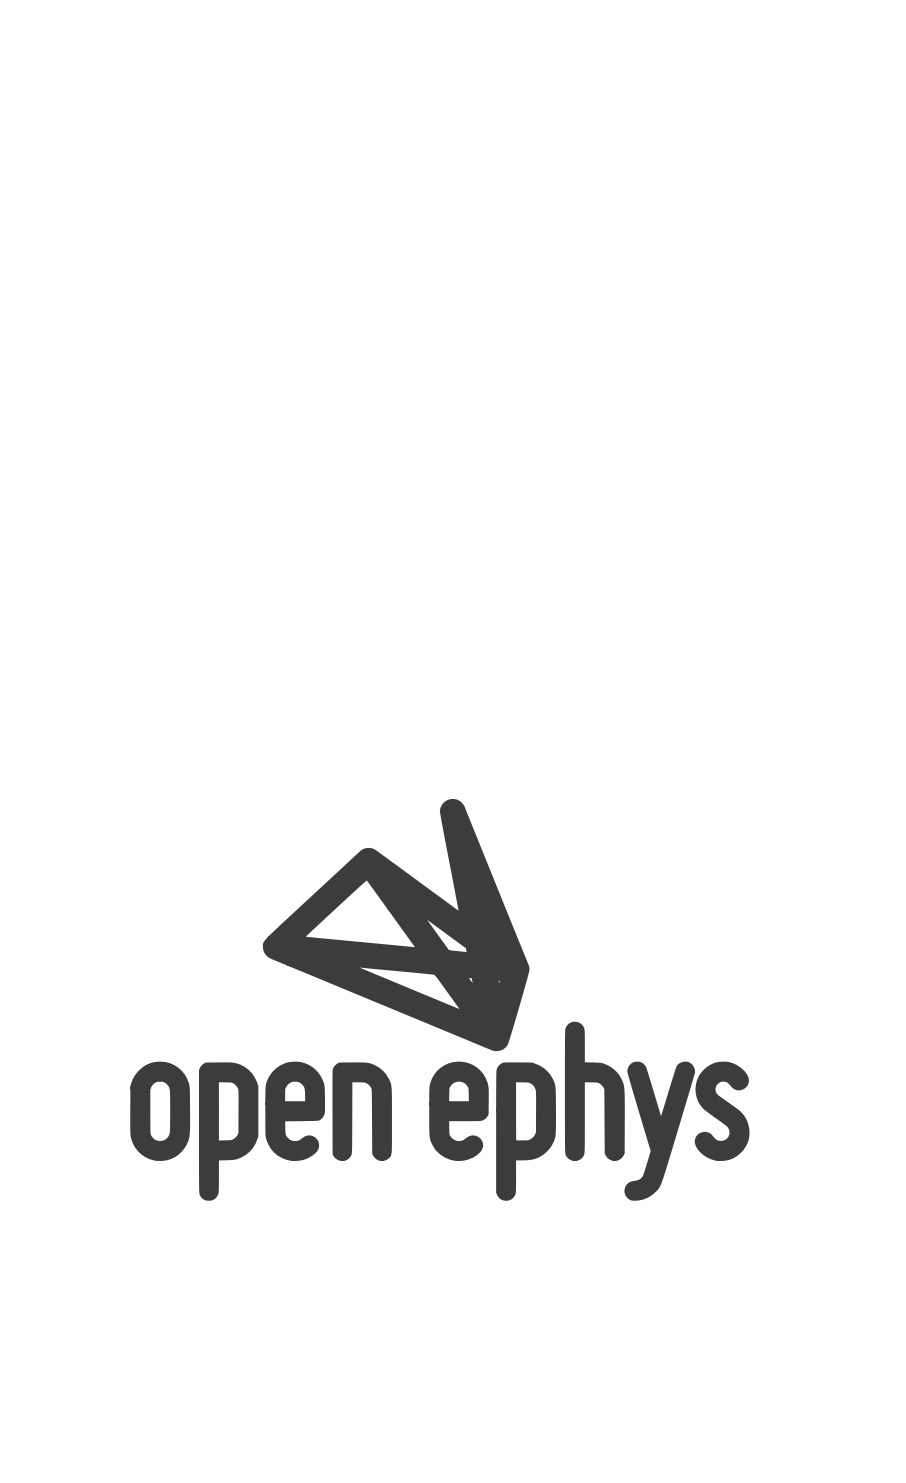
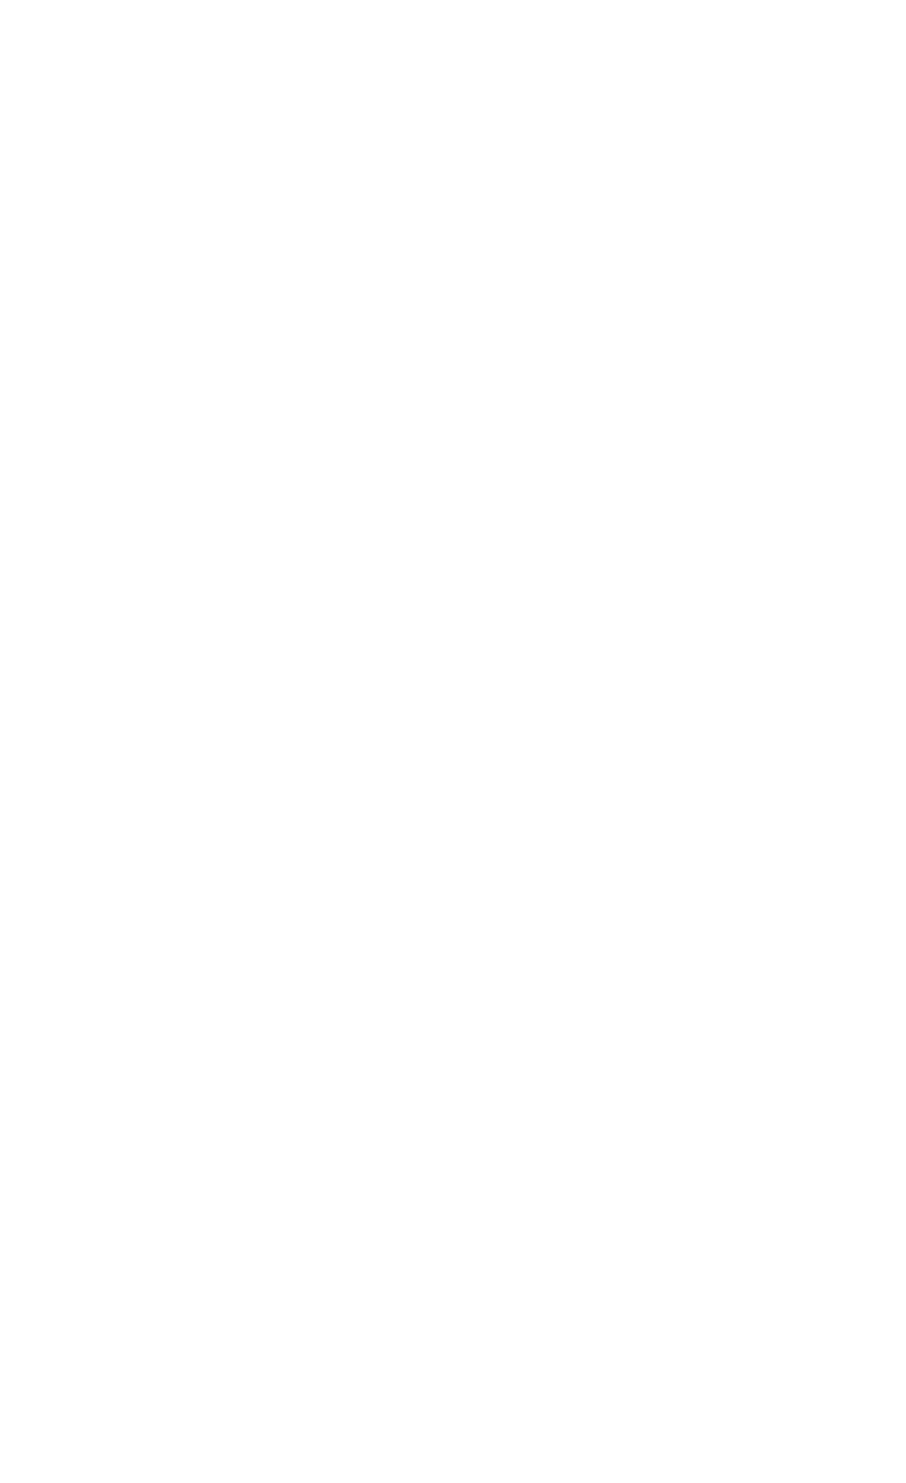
drawing: [130, 798, 750, 1201] -> none

